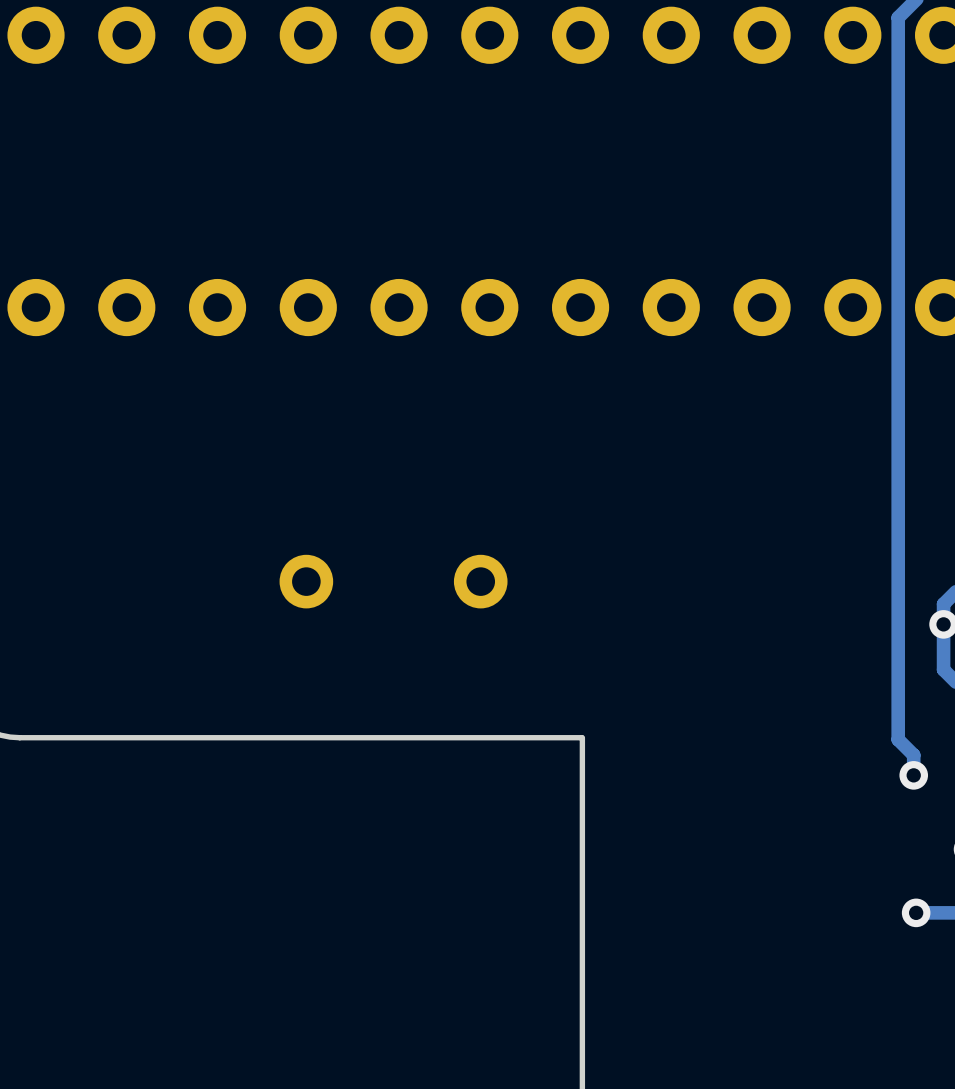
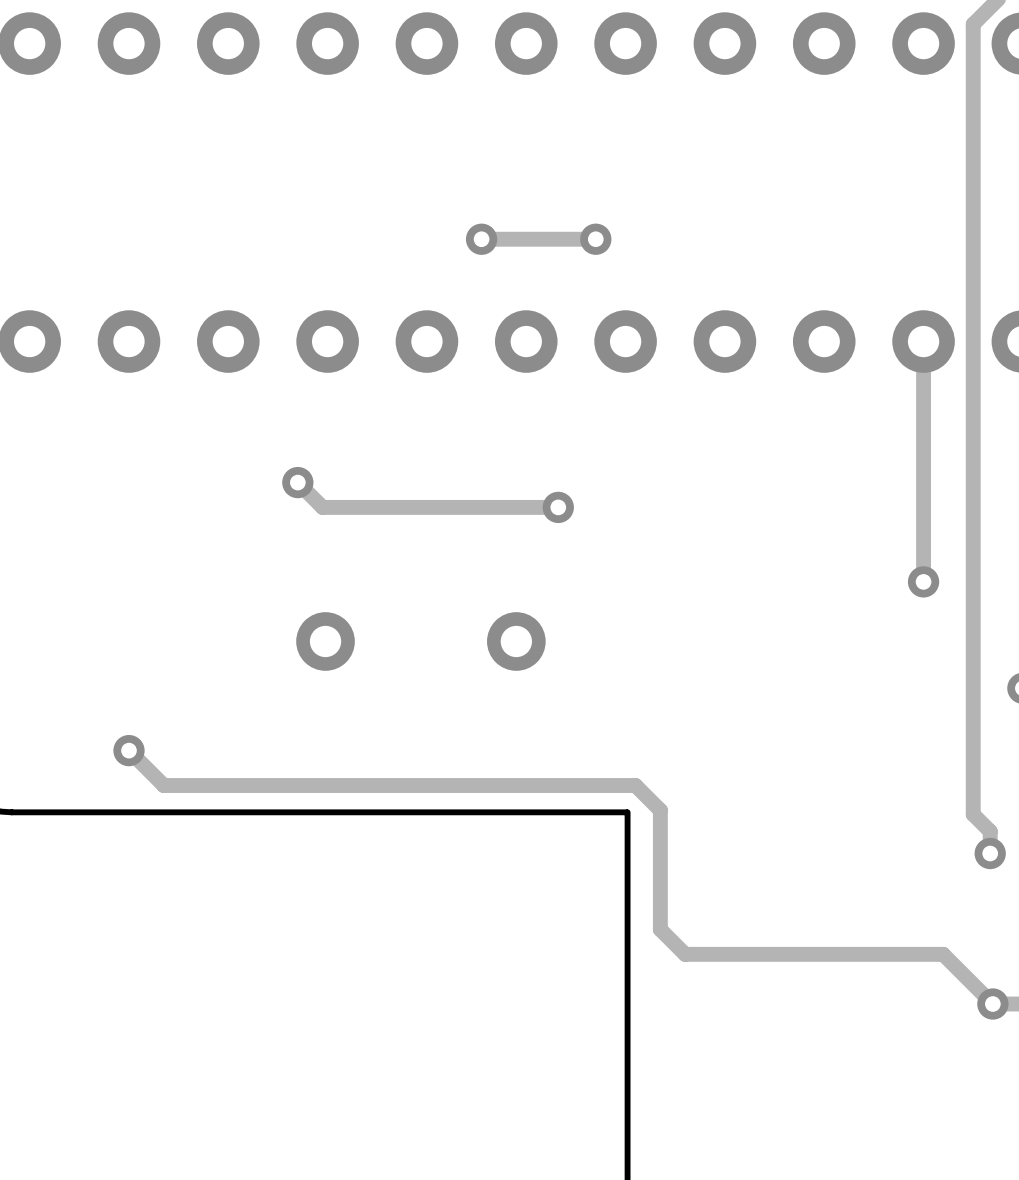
via: none -> (481, 239)
track: none -> (595, 239) (481, 239)
via: none -> (595, 239)
track: none -> (923, 341) (923, 581)
track: none -> (297, 482) (322, 507) (558, 507)
via: none -> (297, 482)
via: none -> (558, 507)
via: none -> (923, 581)
track: none -> (128, 750) (163, 785) (635, 785) (660, 810) (660, 929) (685, 954) (943, 954) (992, 1004)
via: none -> (128, 750)

